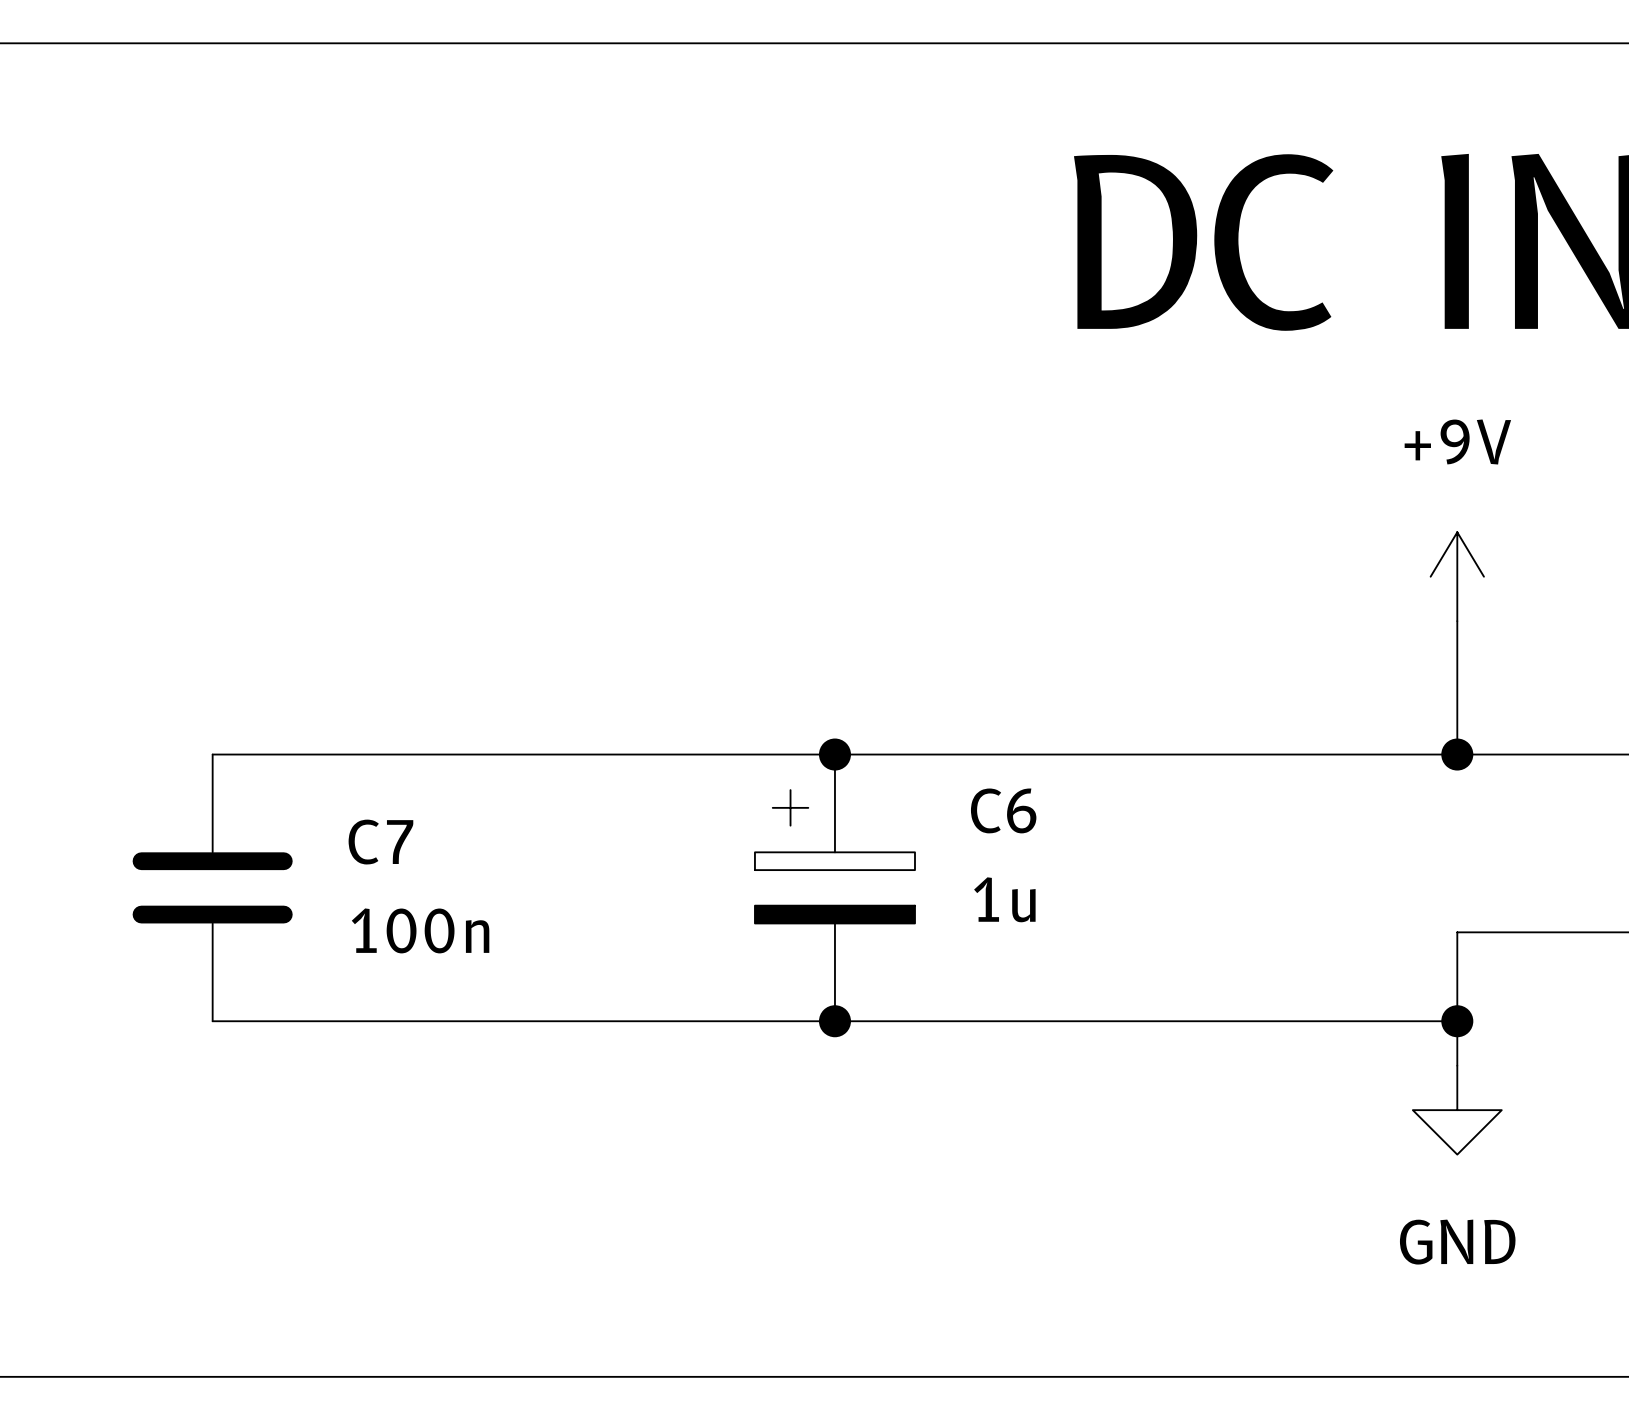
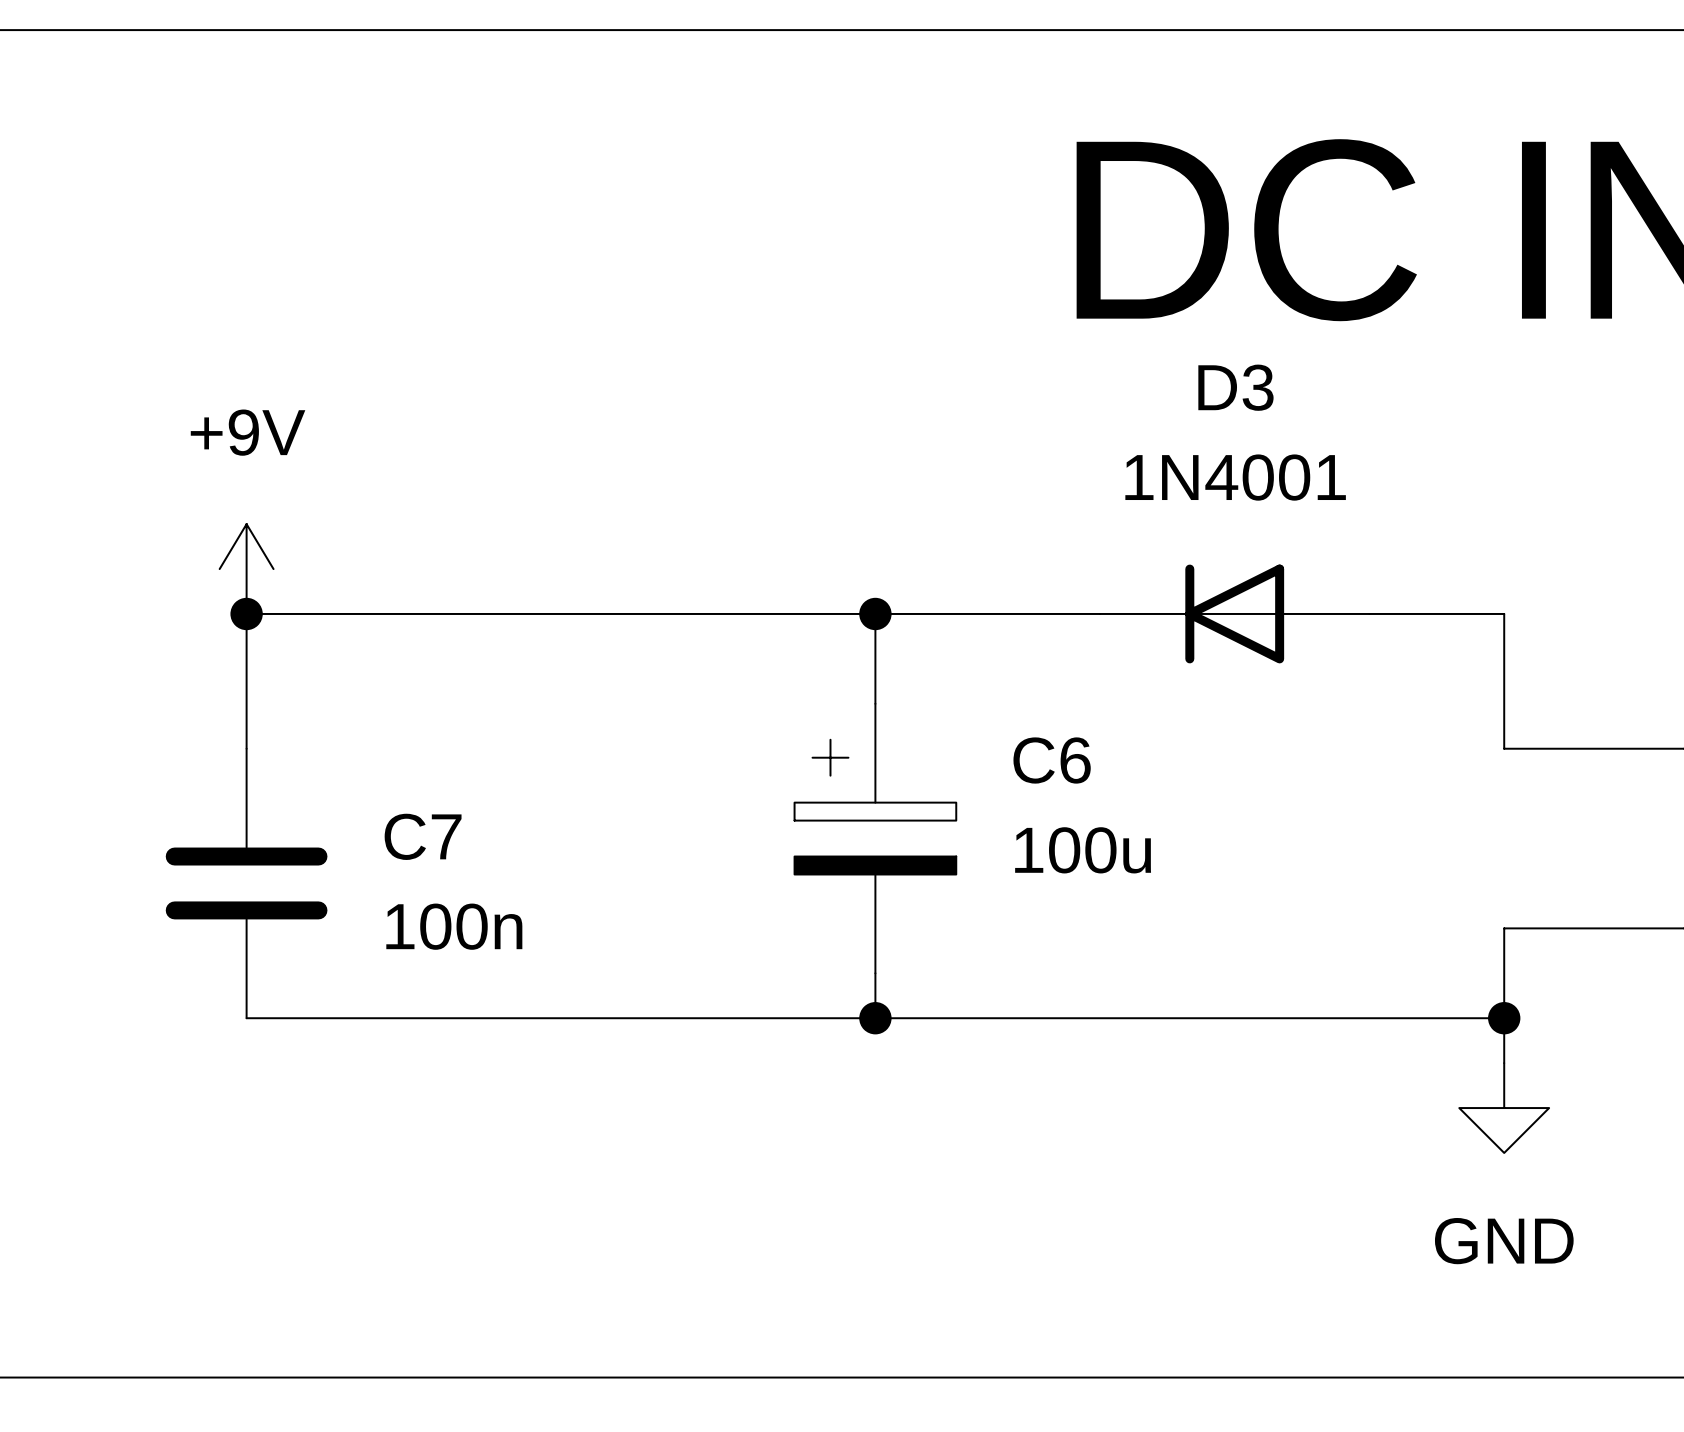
power symbol: none -> +9V (246, 569)
power symbol: +9V (1457, 576) -> none
junction: none -> (246, 613)
wire: none -> (875, 613) (875, 703)
D3: none -> 1N4001 (1234, 613)
wire: none -> (1369, 613) (1504, 613)
wire: (212, 754) (1457, 754) -> (246, 748) (246, 613) (1099, 613)
junction position: (834, 754) -> (875, 613)
junction: (1457, 754) -> none
C6 position: (834, 887) -> (875, 838)
C6 value: 1u (1004, 899) -> 100u (1083, 850)

